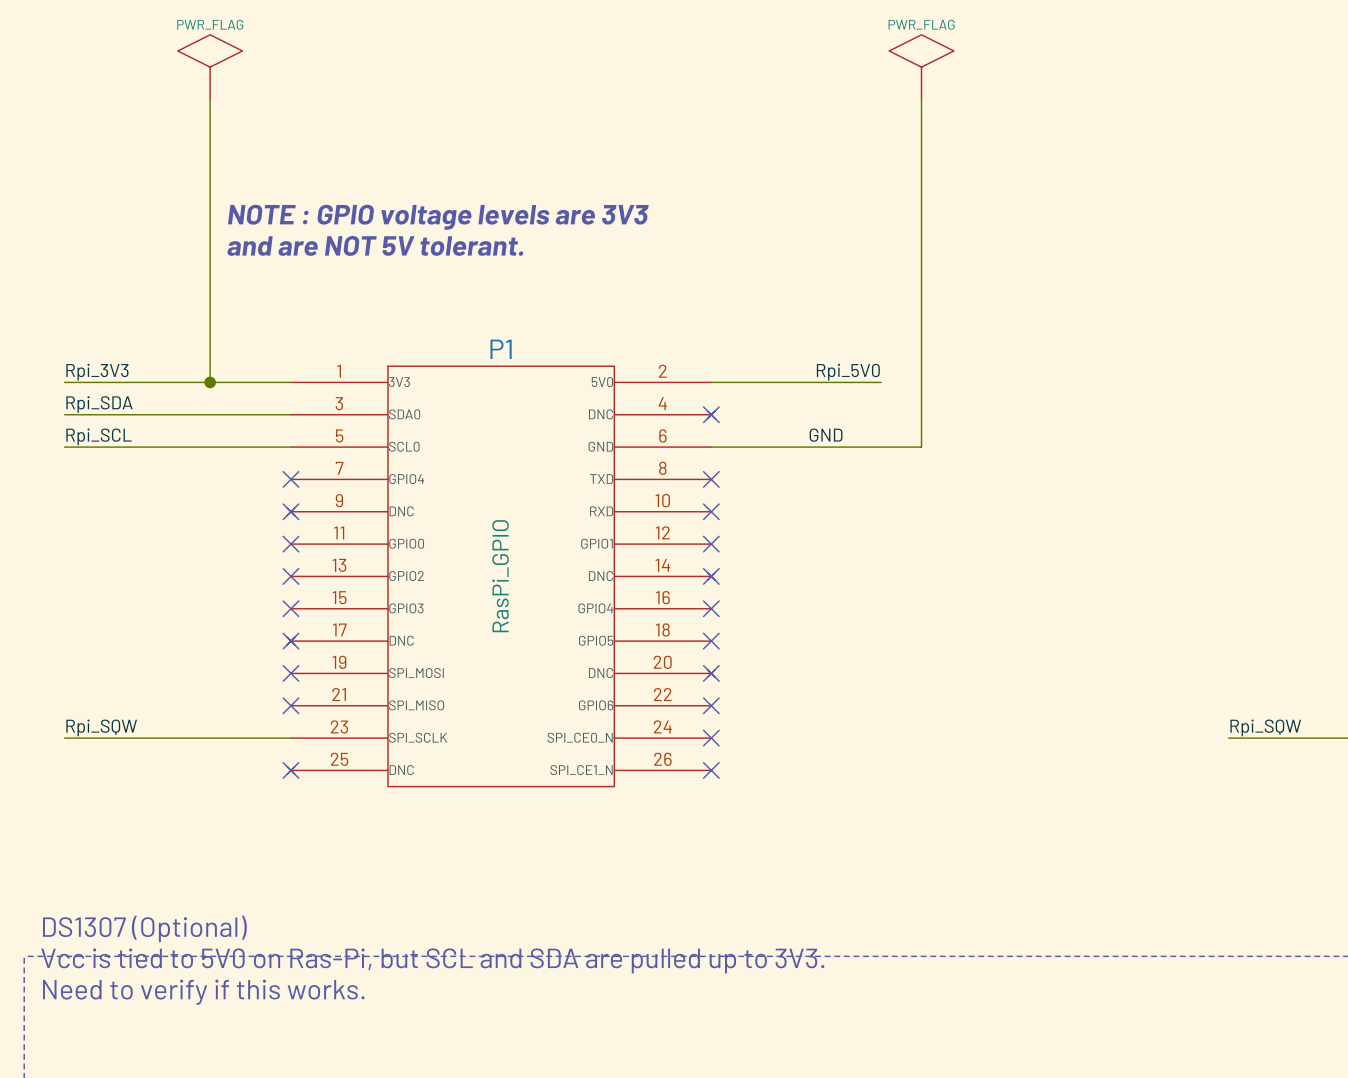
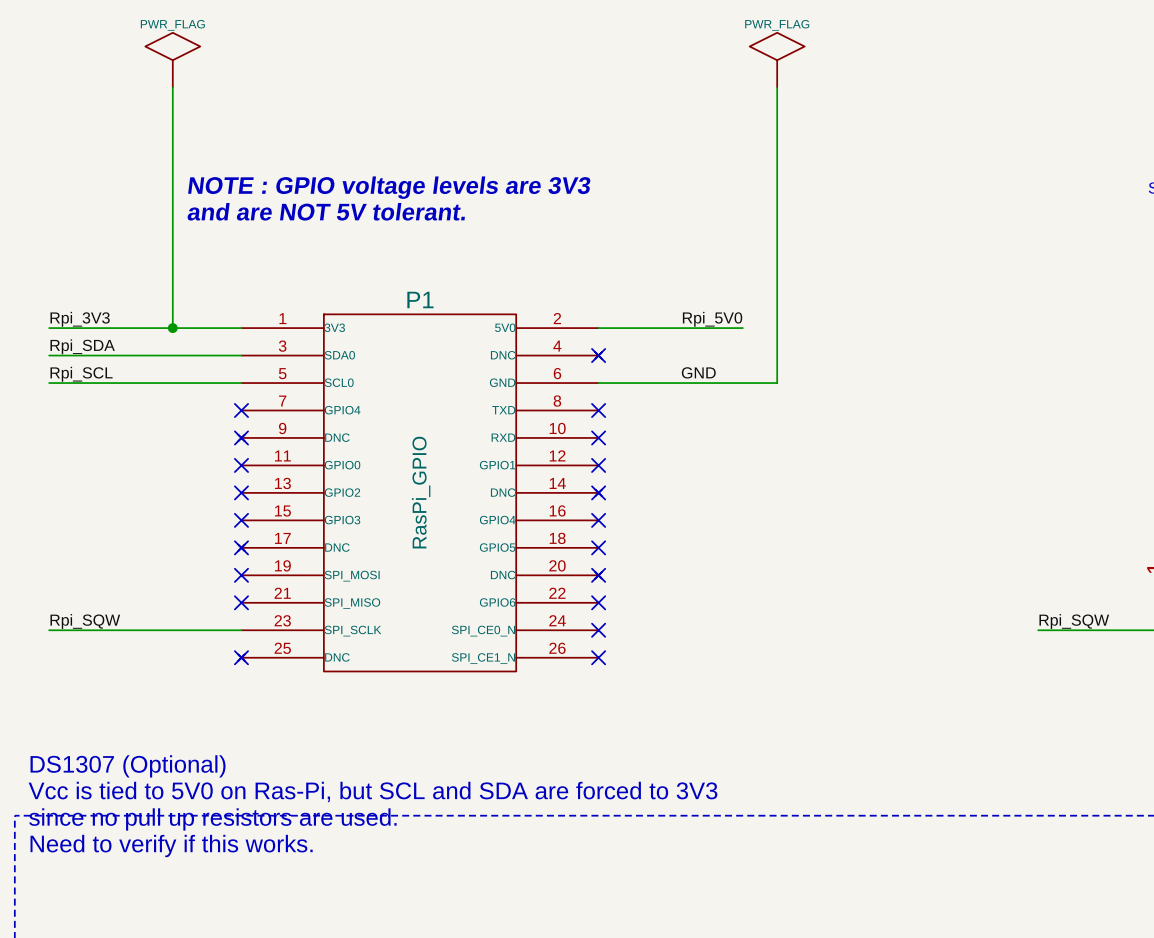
text: none -> DS1307 (Optional) (128, 766)
text: DS1307 (Optional) (144, 928) -> Vcc is tied to 5V0 on Ras-Pi, but SCL and SDA are forced to 3V3 (373, 791)
text: Vcc is tied to 5V0 on Ras-Pi, but SCL and SDA are pulled up to 3V3. (432, 960) -> since no pull up resistors are used. (212, 819)

